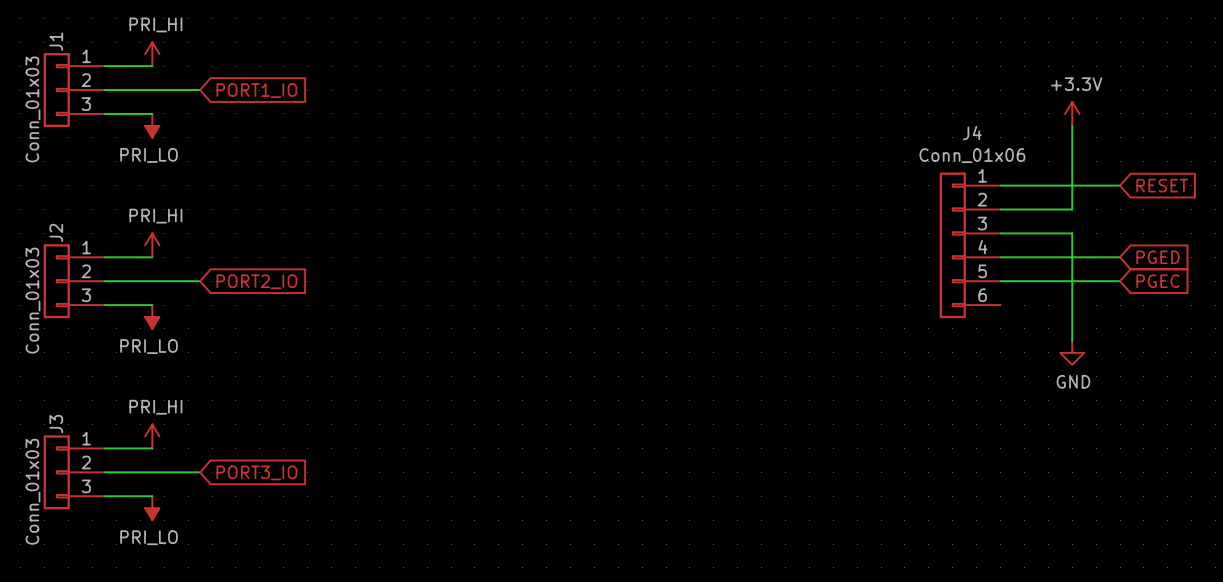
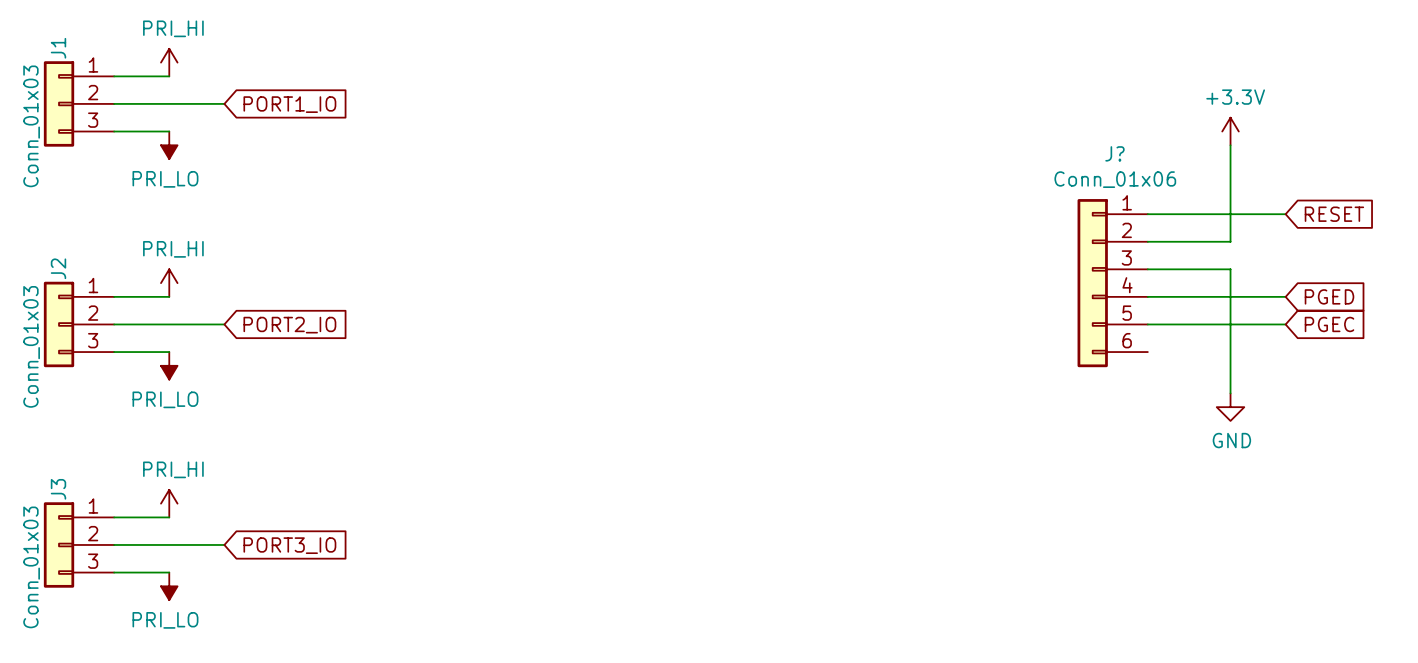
J4 name: J4 (972, 133) -> J? (1114, 153)

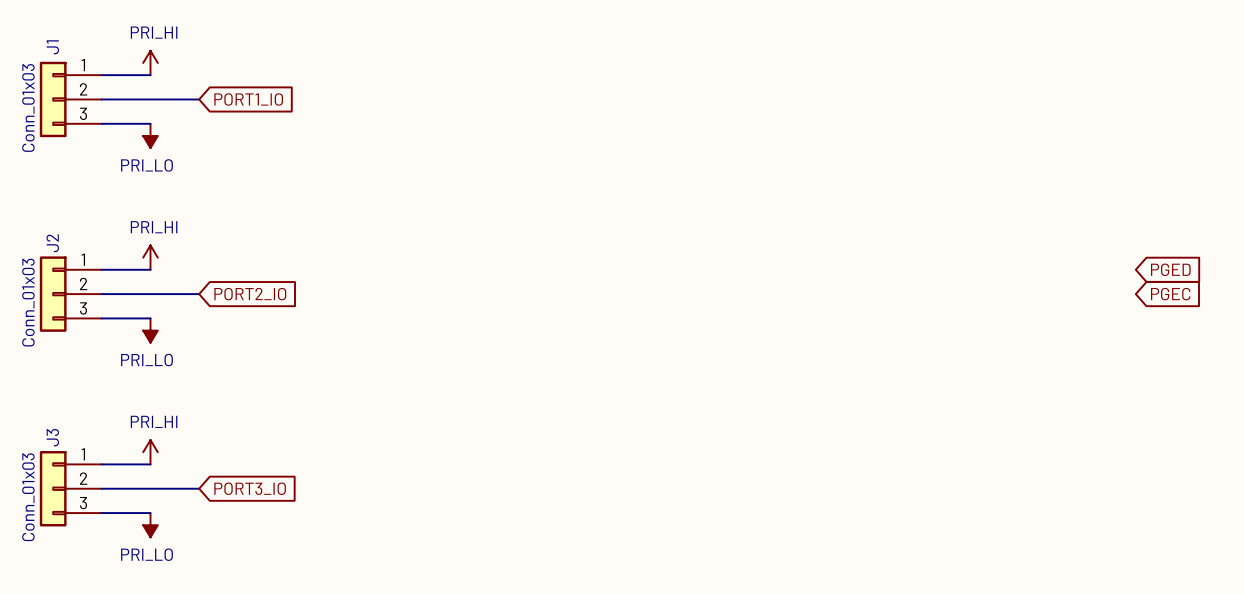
power symbol: +3.3V (1230, 131) -> none
wire: (1230, 145) (1230, 241) (1147, 241) -> none
wire: (1147, 214) (1285, 214) -> none
global label: RESET (1334, 214) -> none
wire: (1147, 269) (1230, 269) (1230, 393) -> none
J?: Conn_01x06 (1112, 283) -> none
wire: (1147, 296) (1285, 296) -> none
wire: (1147, 324) (1285, 324) -> none
power symbol: GND (1230, 407) -> none

